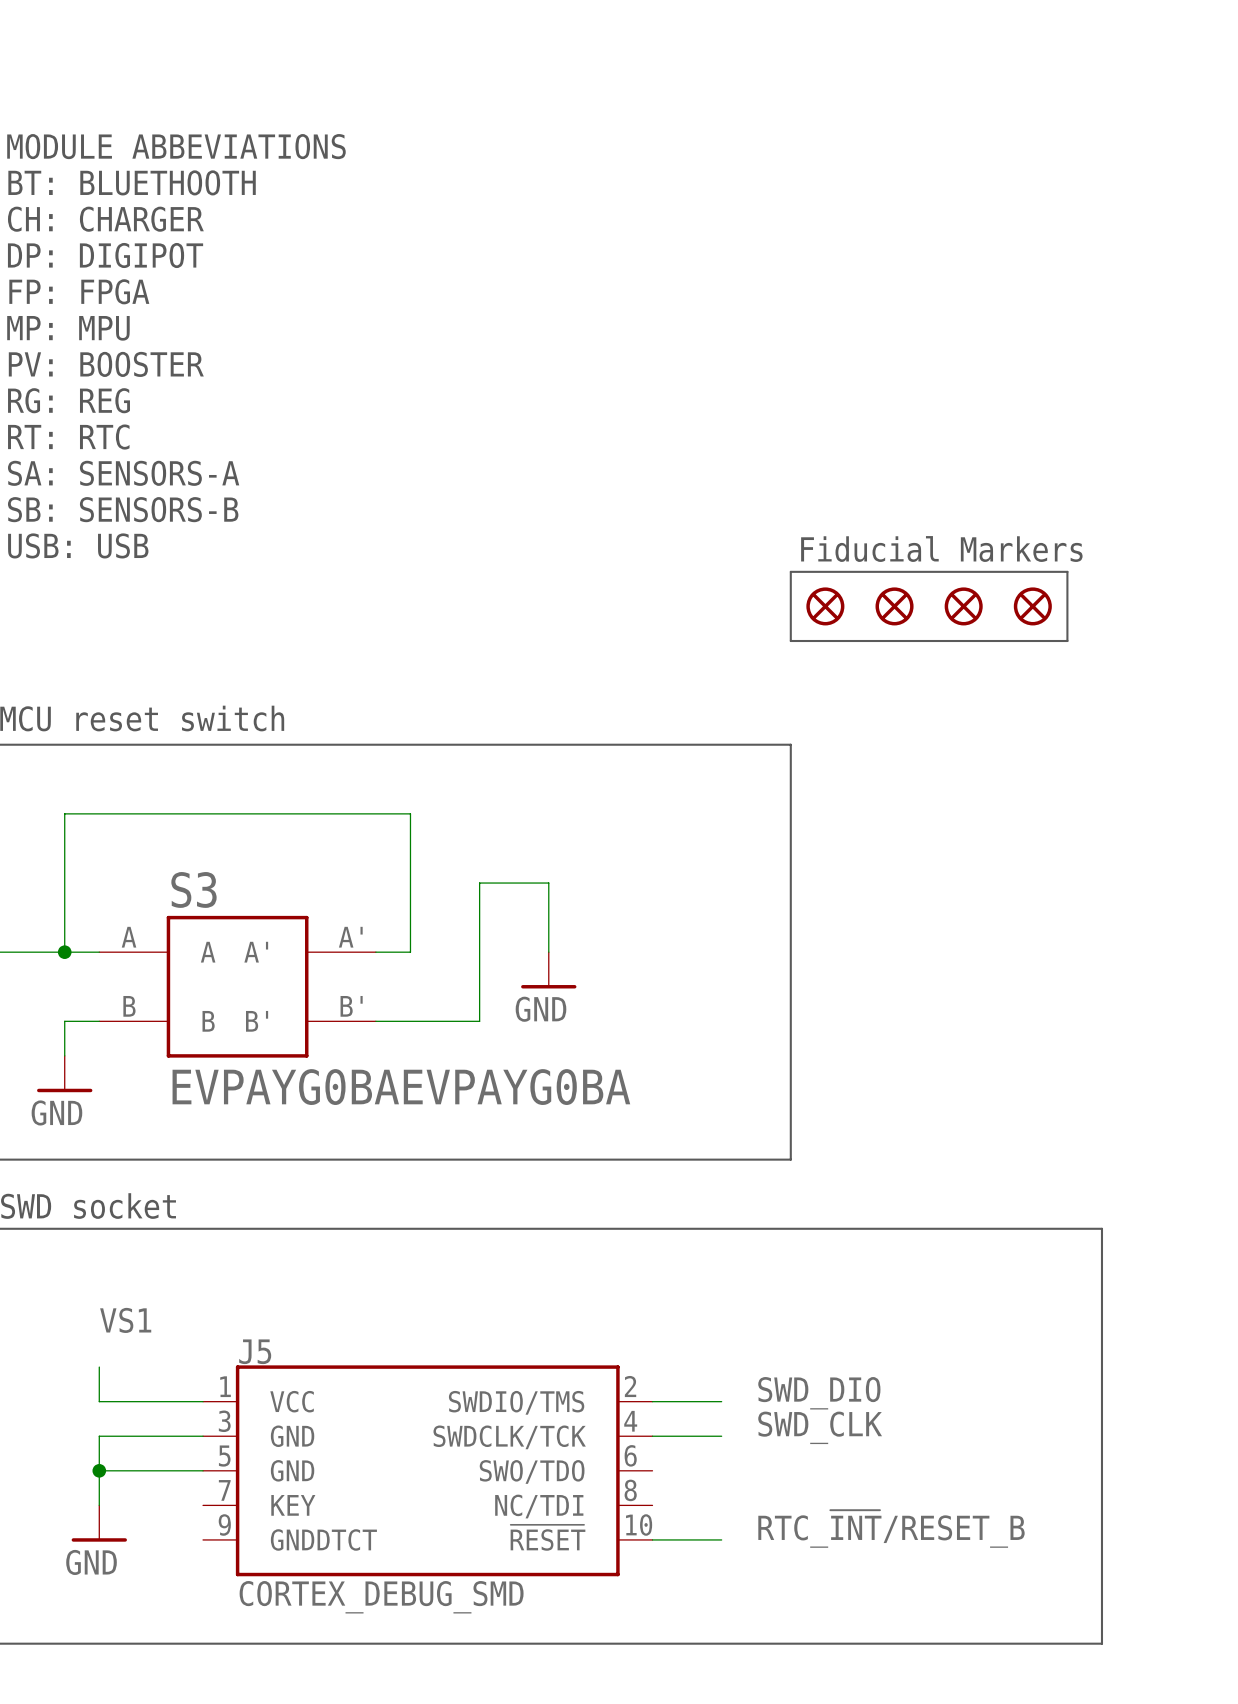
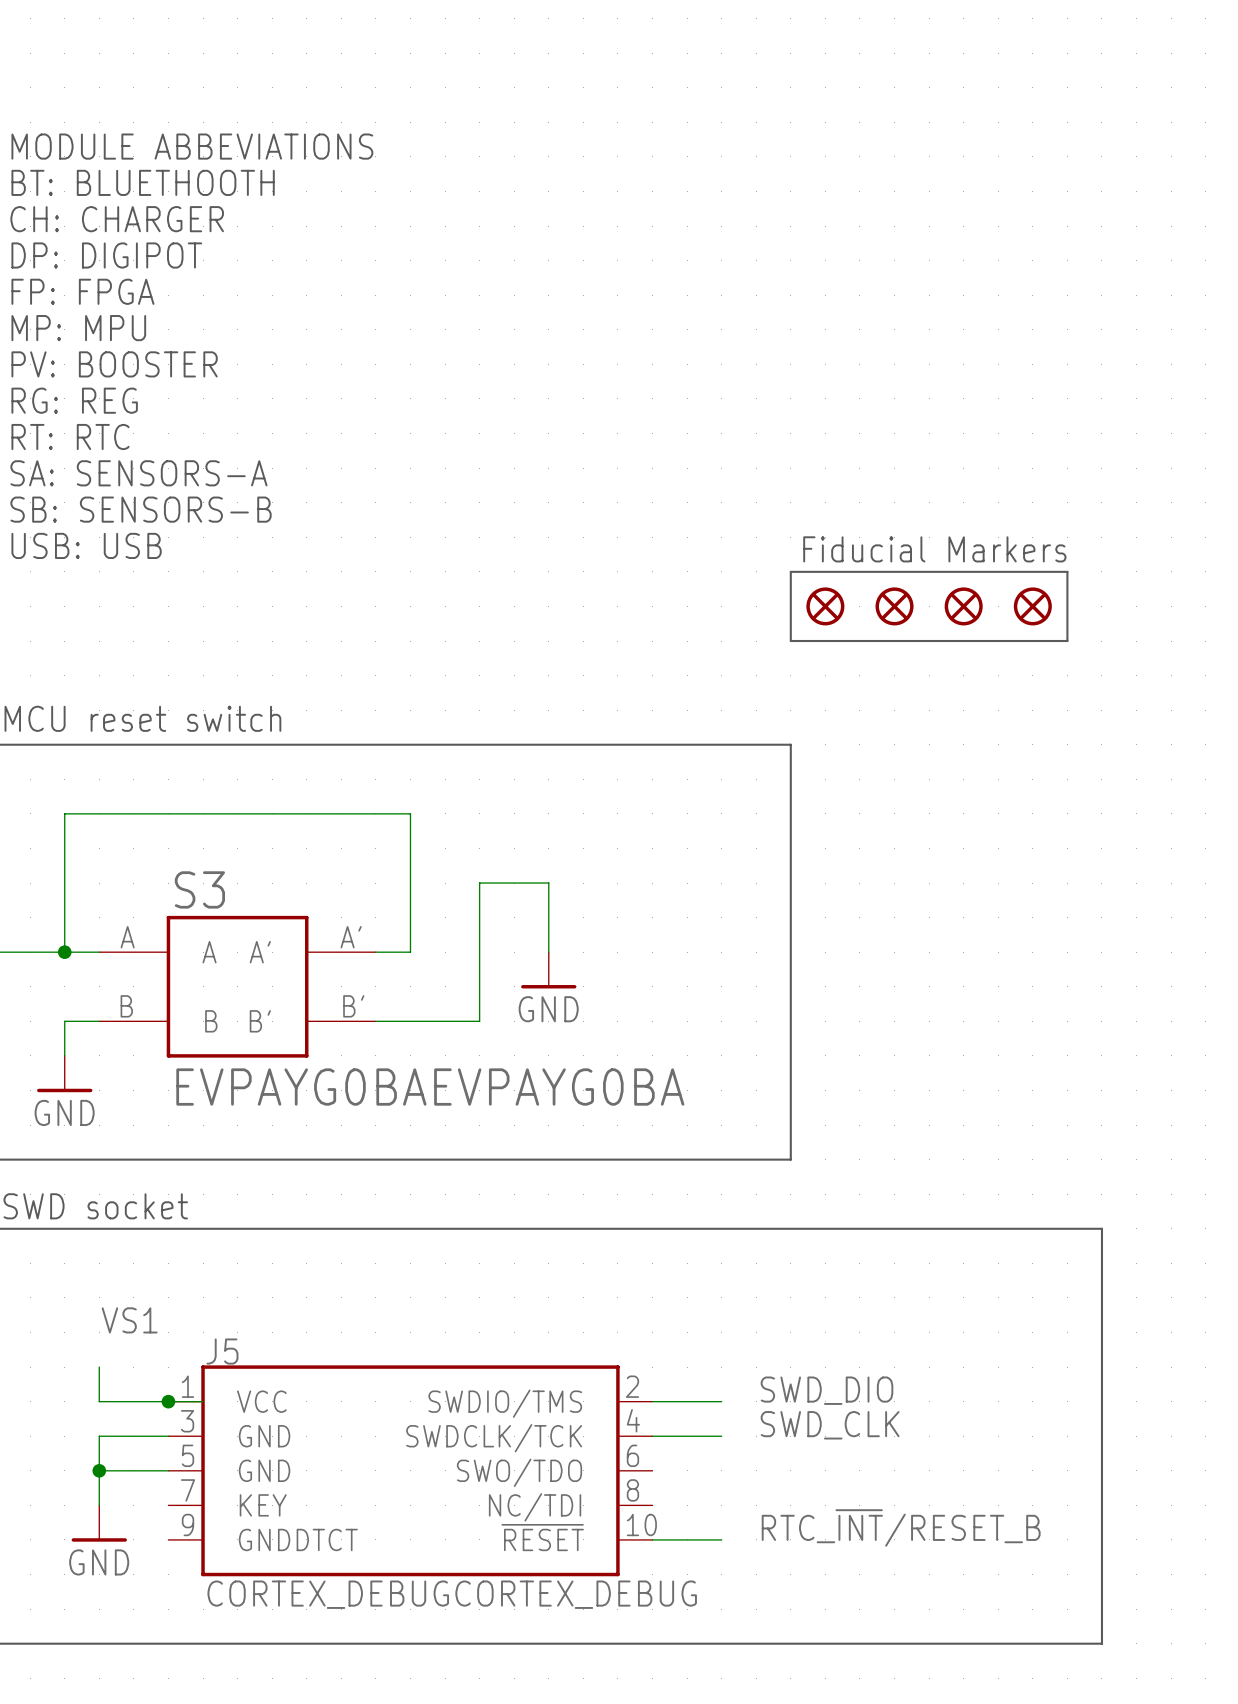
J5 symbol: [203, 1365, 653, 1577] -> [168, 1365, 653, 1577]
junction: none -> (168, 1401)
J5 value: CORTEX_DEBUG_SMD (381, 1597) -> CORTEX_DEBUGCORTEX_DEBUG (452, 1594)

